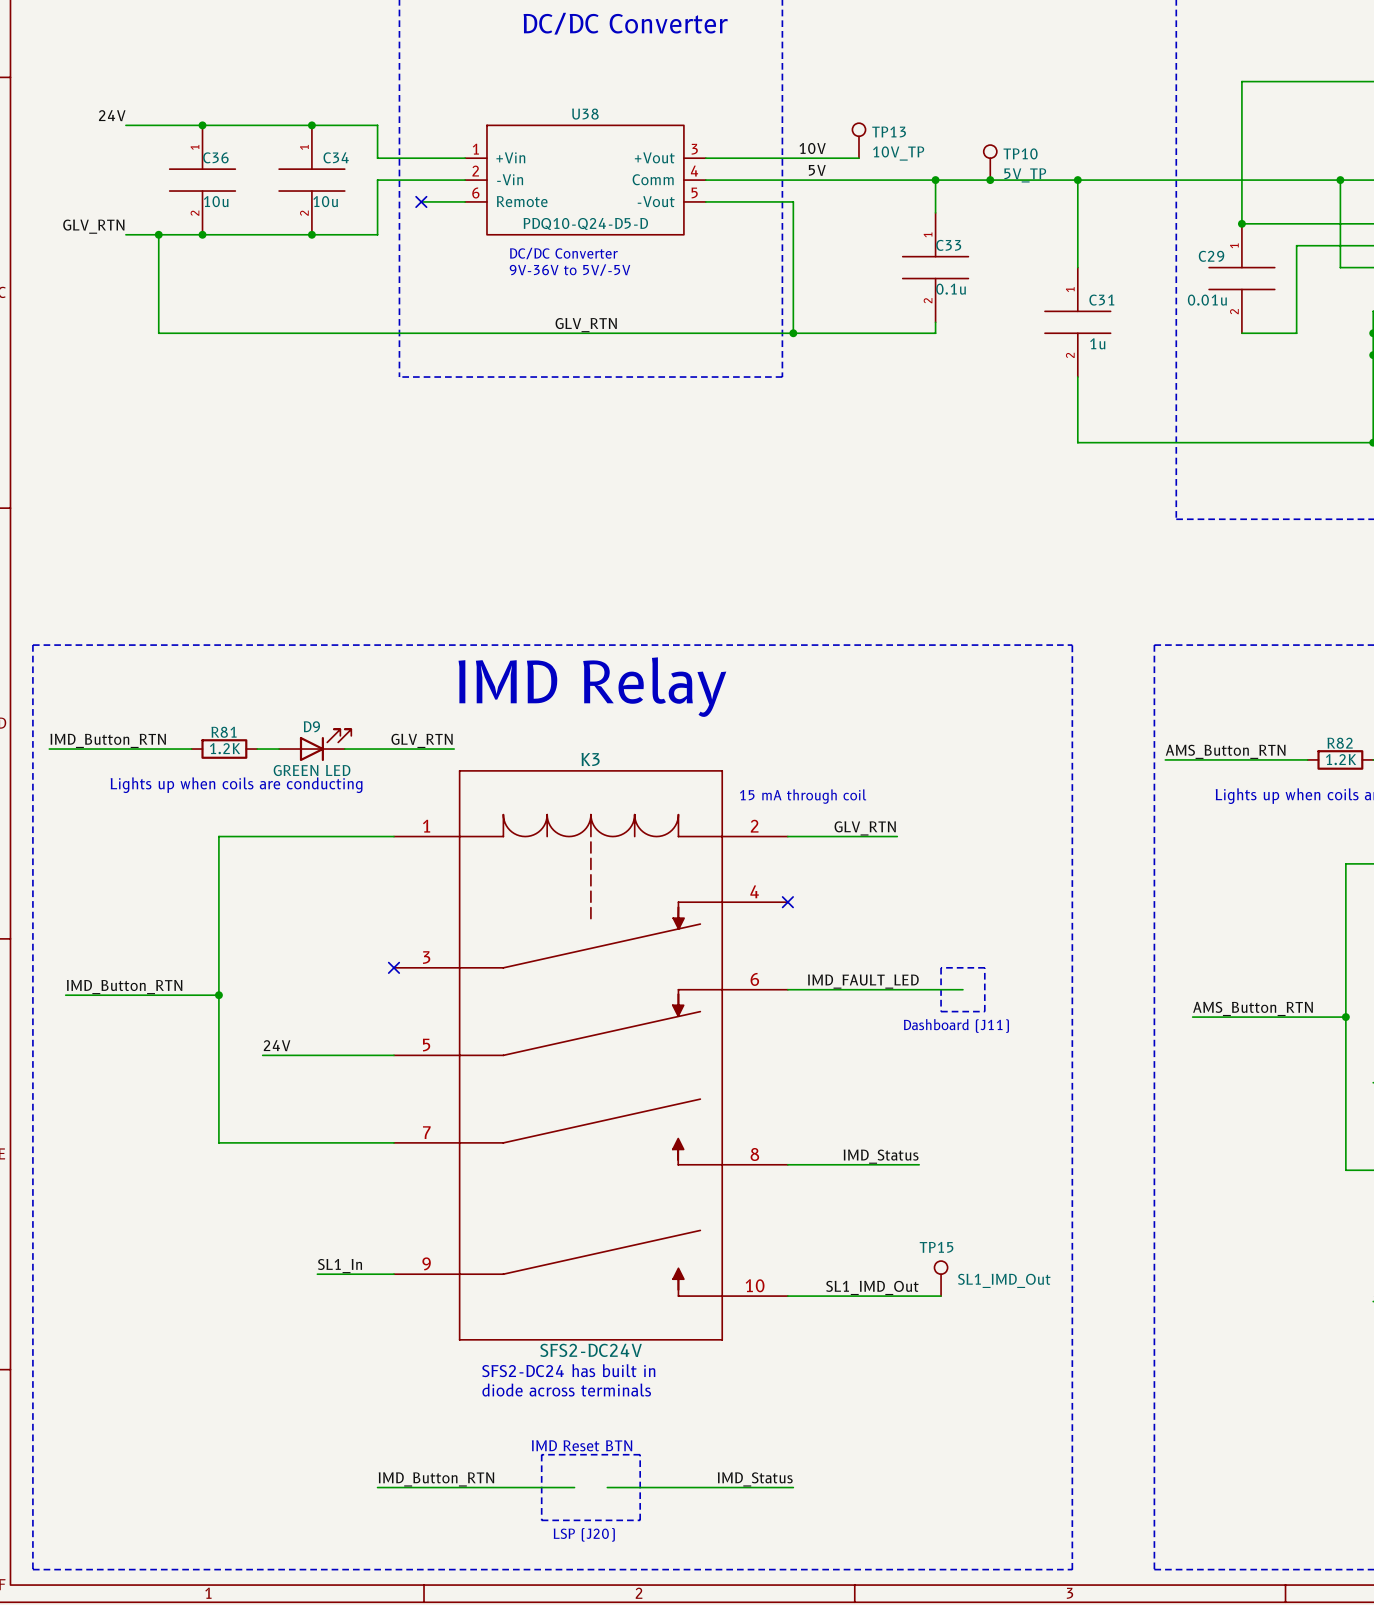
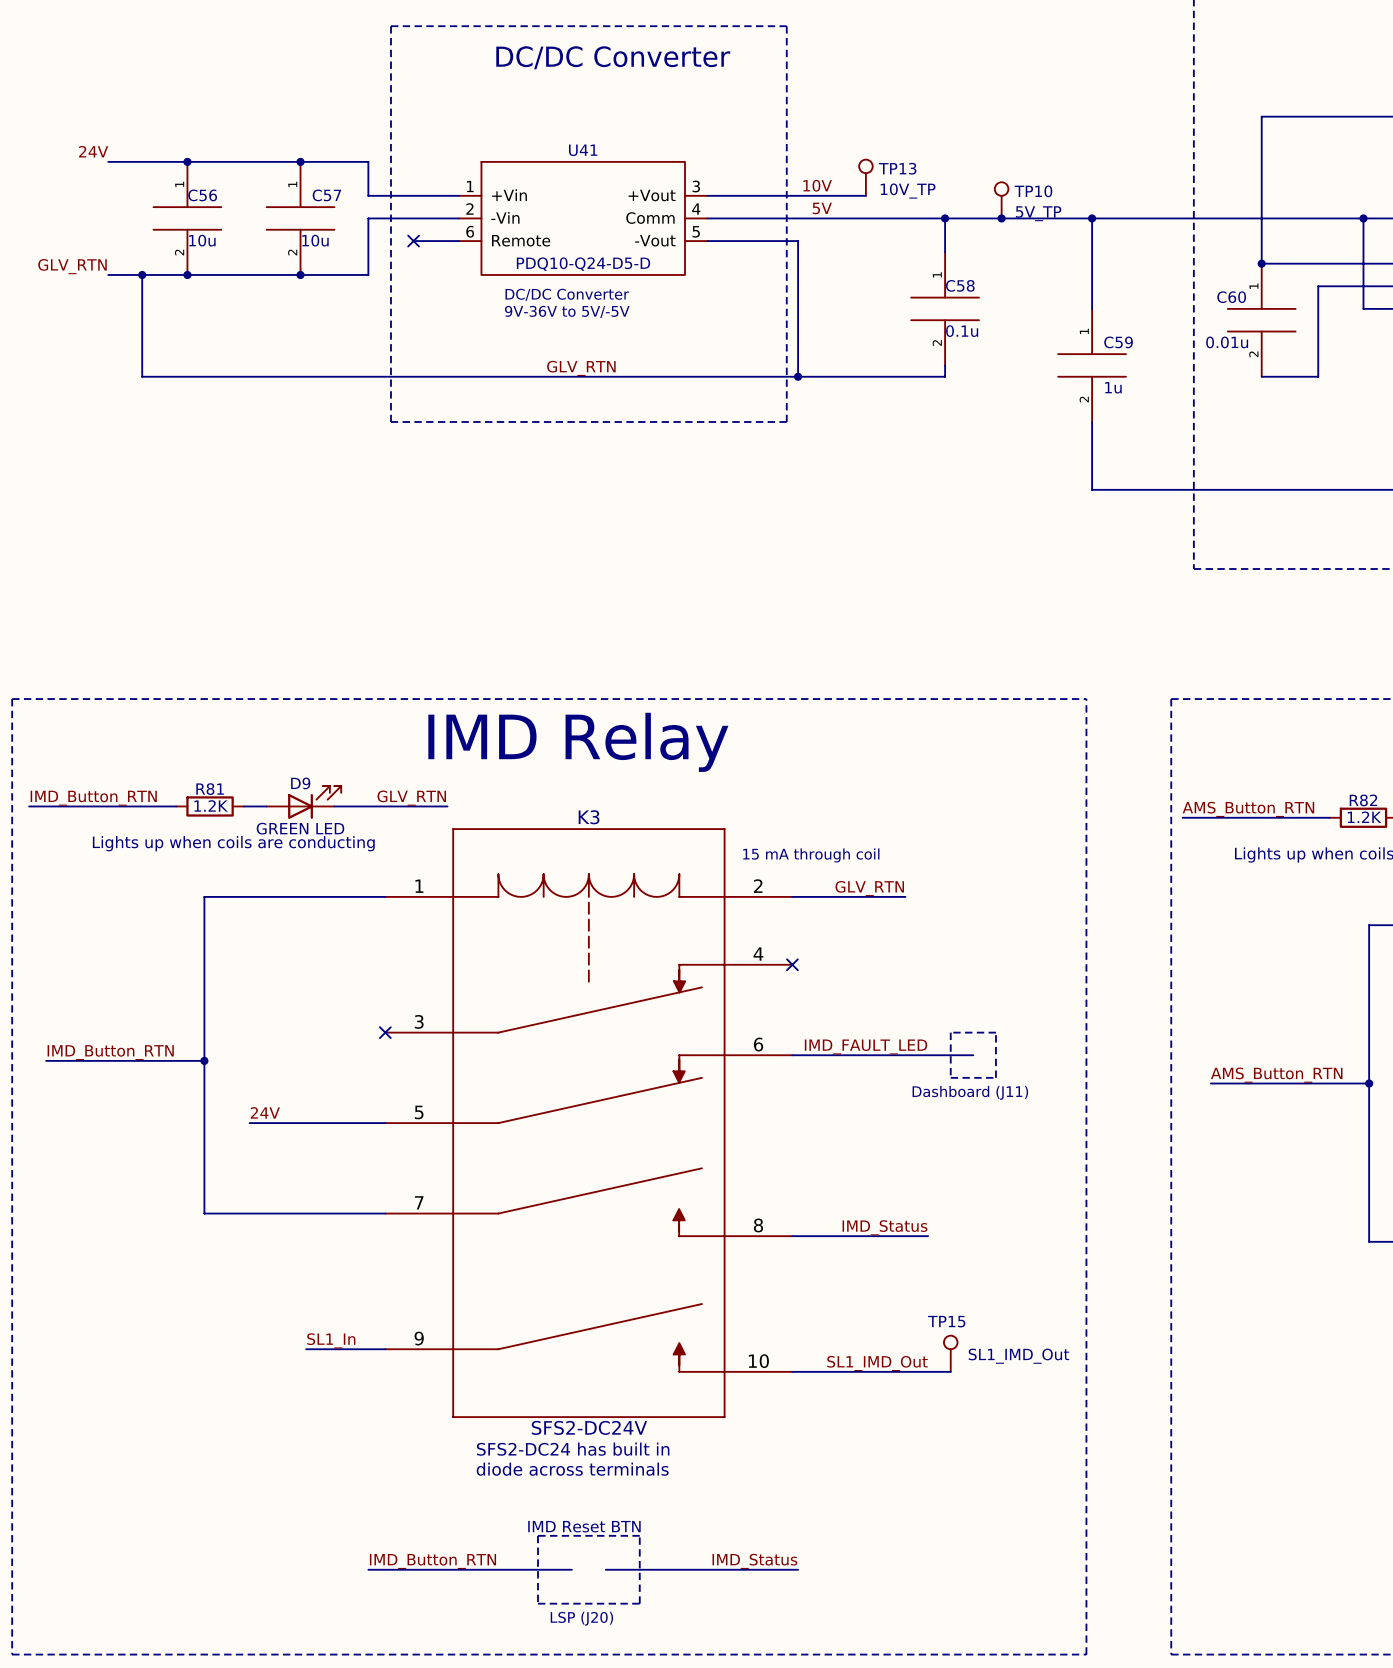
U38 name: U38 (585, 114) -> U41 (583, 150)
C36 name: C36 (215, 157) -> C56 (202, 195)
C34 name: C34 (336, 157) -> C57 (326, 195)
C33 name: C33 (948, 245) -> C58 (960, 285)
C29 name: C29 (1211, 256) -> C60 (1231, 297)
C31 name: C31 (1101, 300) -> C59 (1118, 342)

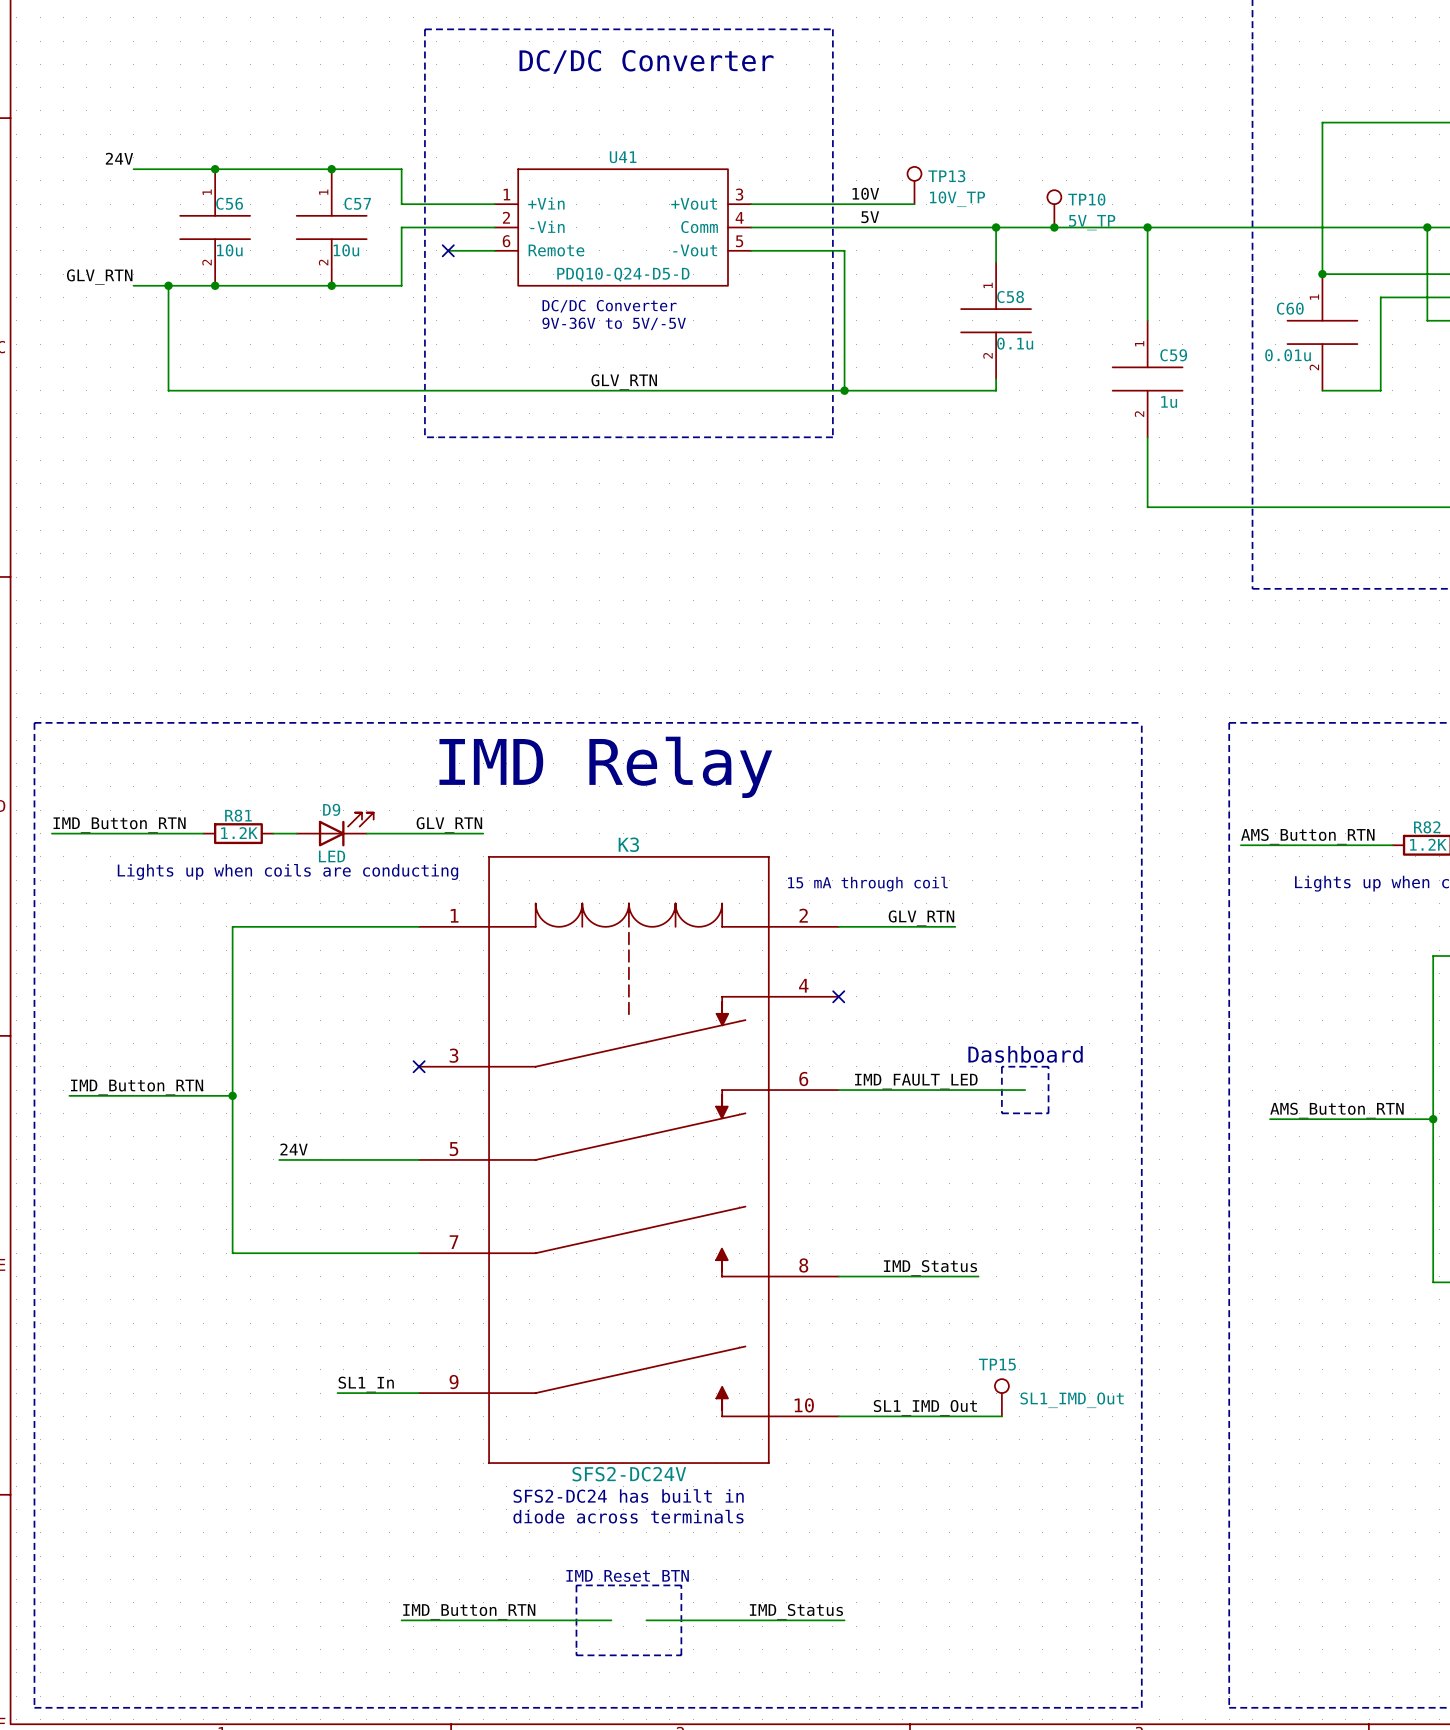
D9 value: GREEN LED (300, 828) -> LED (332, 856)
text: none -> Dashboard (1025, 1054)
text: Dashboard (J11) (970, 1092) -> none
text: LSP (J20) (581, 1618) -> none

